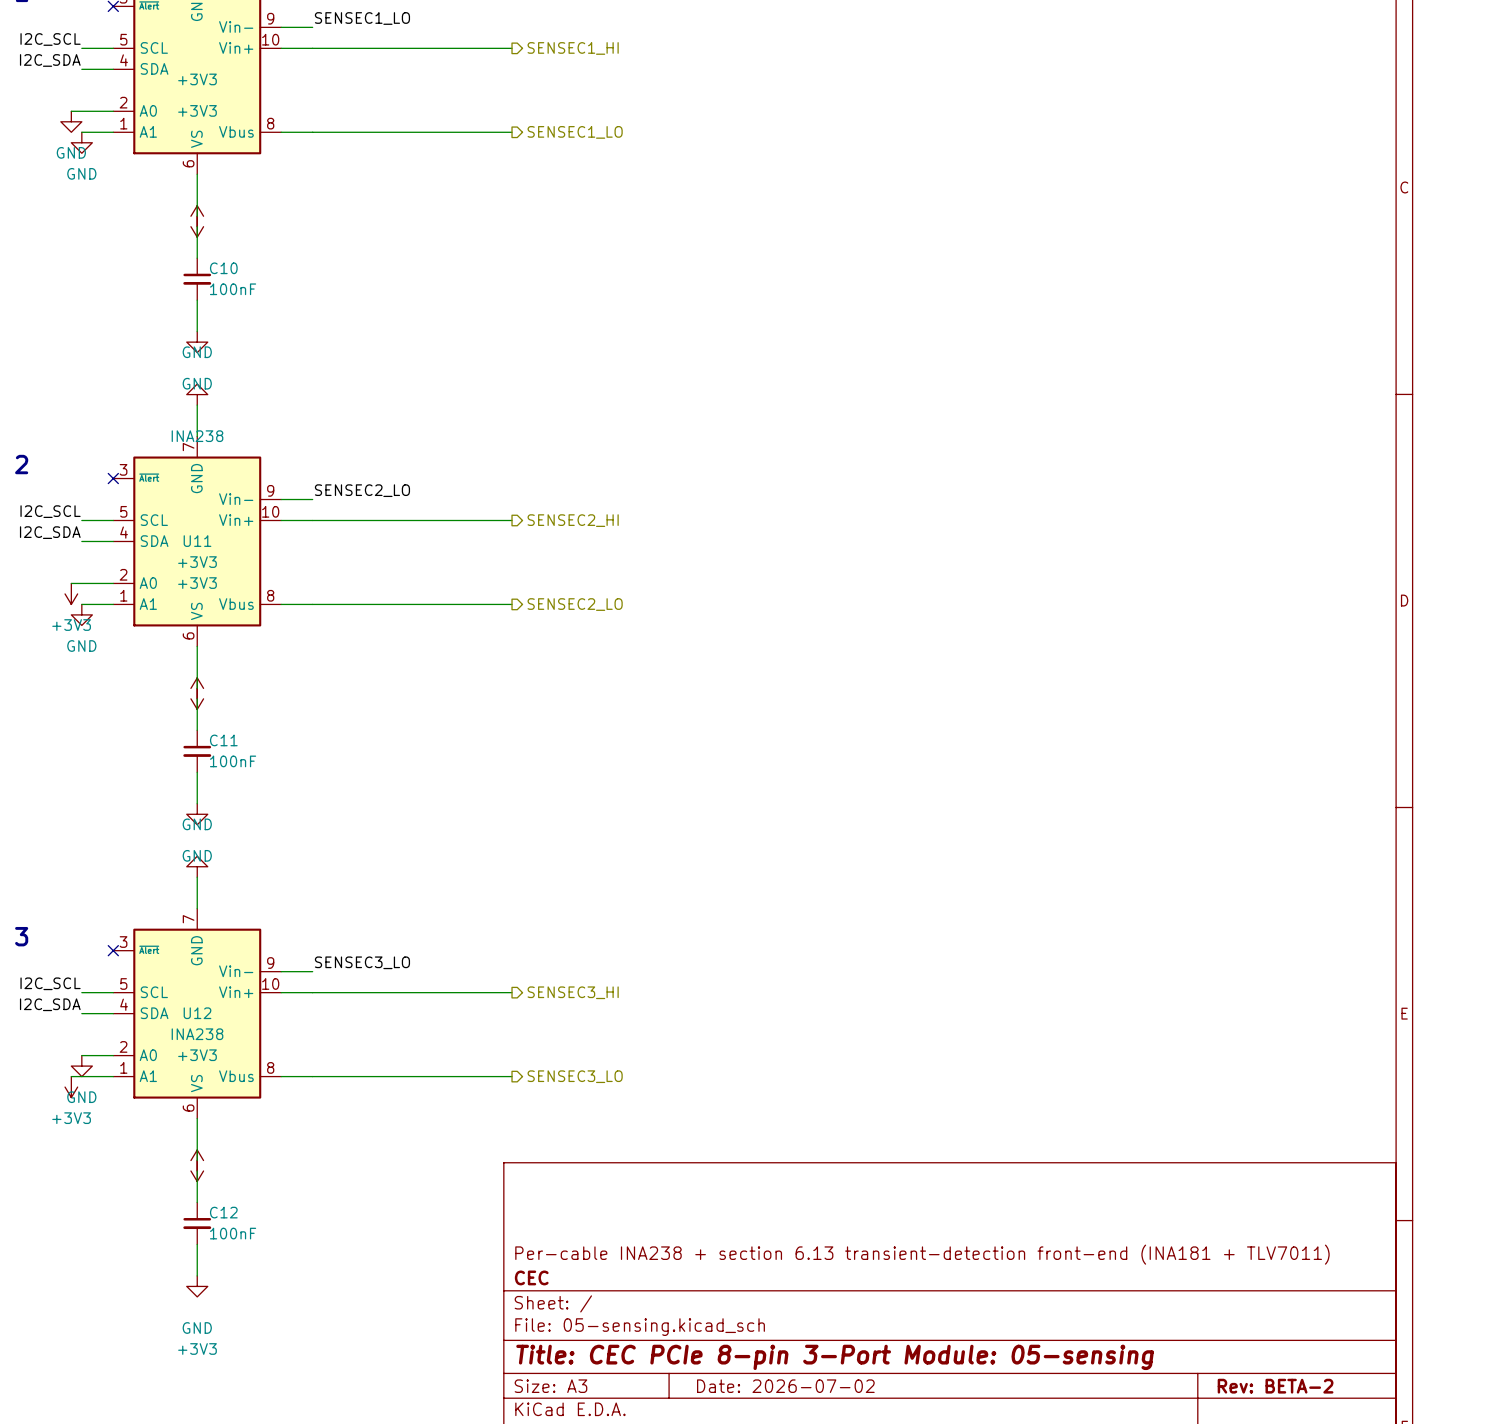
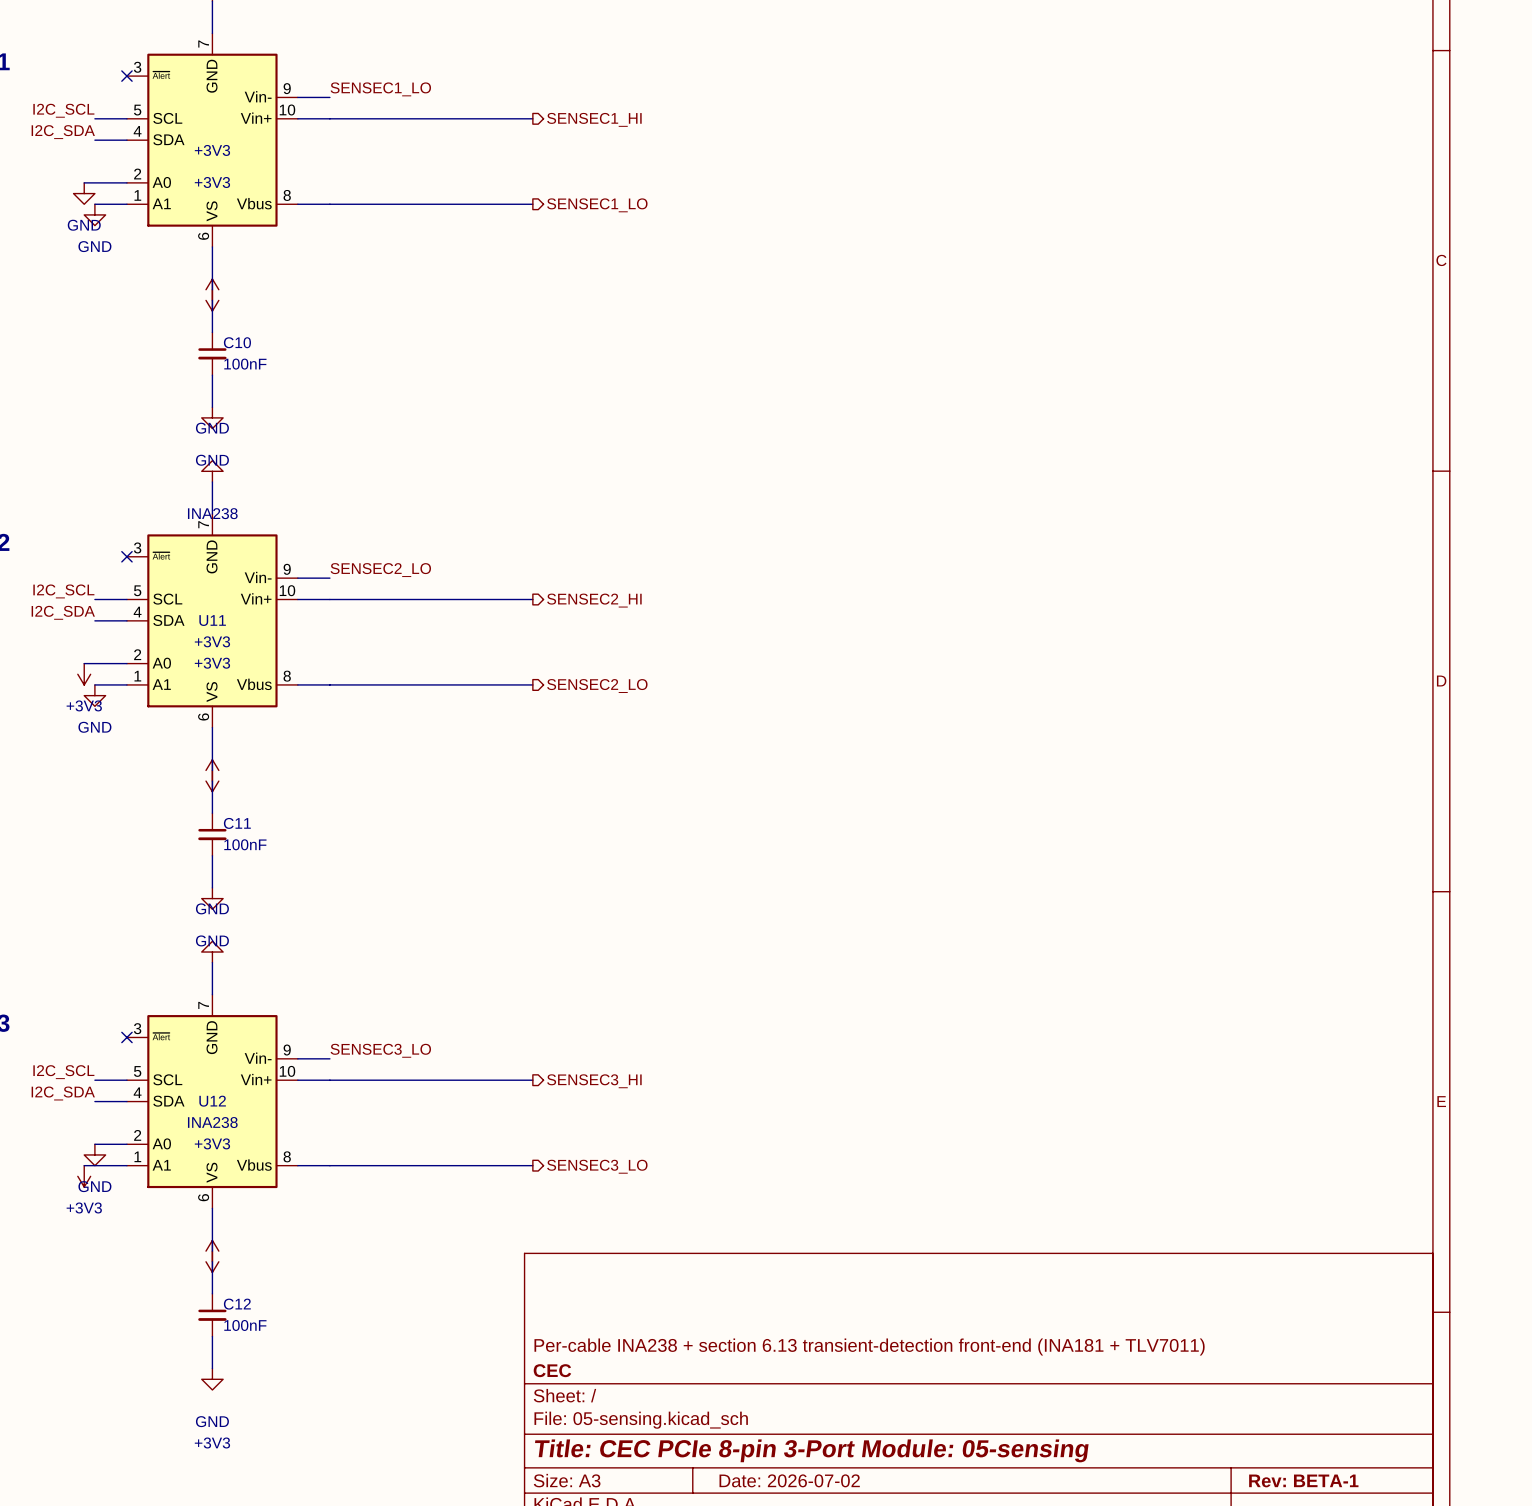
title block: Rev: BETA-2 (1275, 1386) -> Rev: BETA-1 (1303, 1480)

